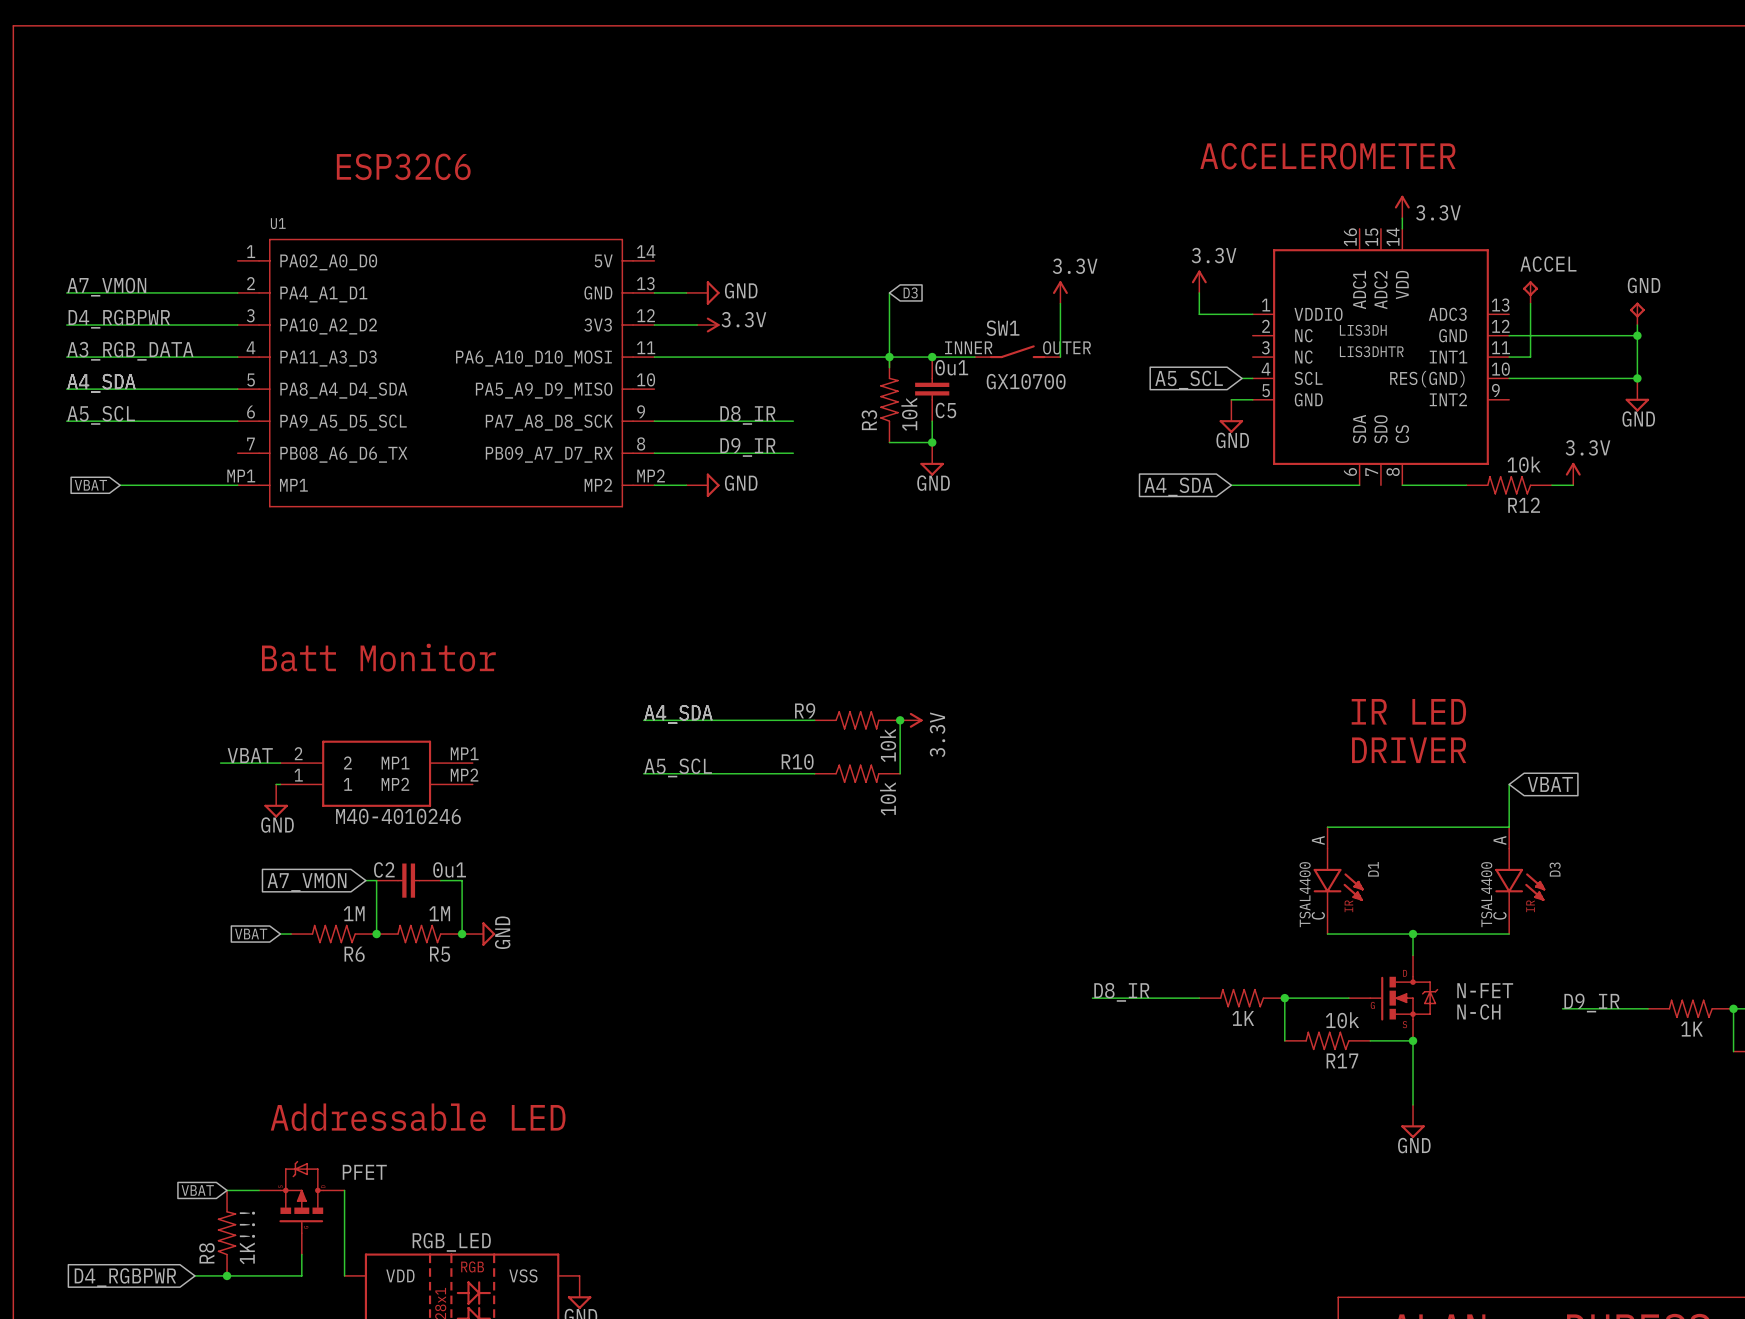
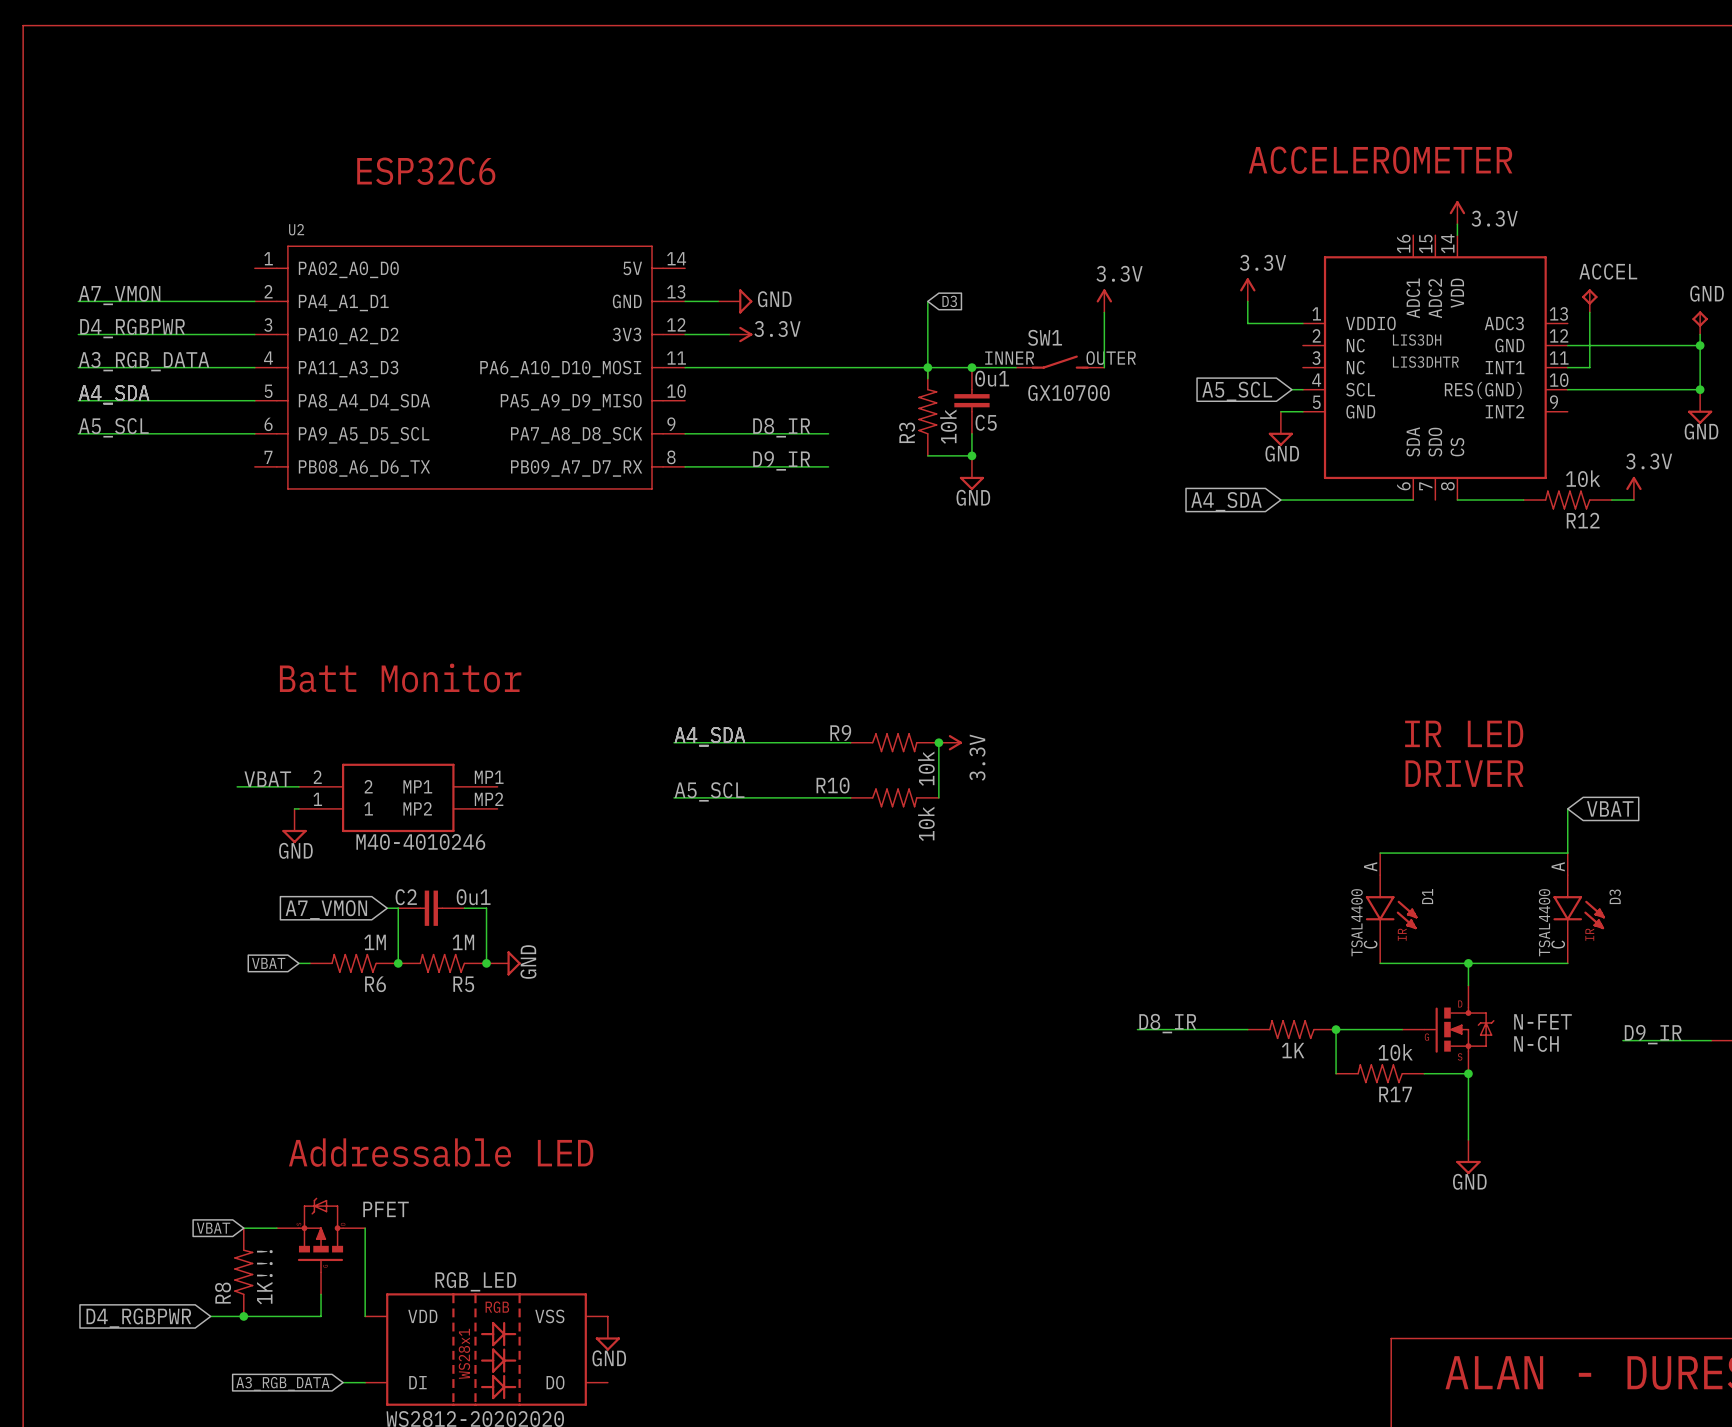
U2: none -> (469, 367)
U1: (446, 373) -> none
global label: VBAT (90, 485) -> none
wire: (120, 485) (237, 485) -> none
wire: (654, 485) (686, 485) -> none
power symbol: GND (703, 485) -> none

